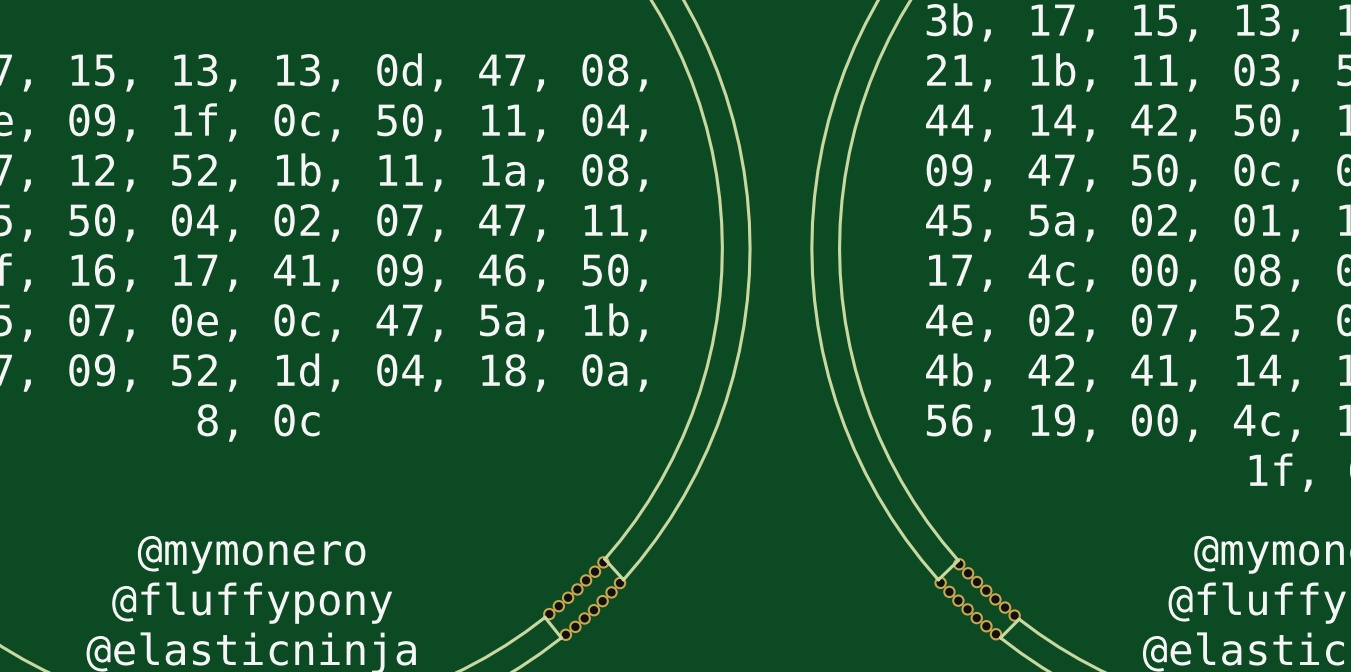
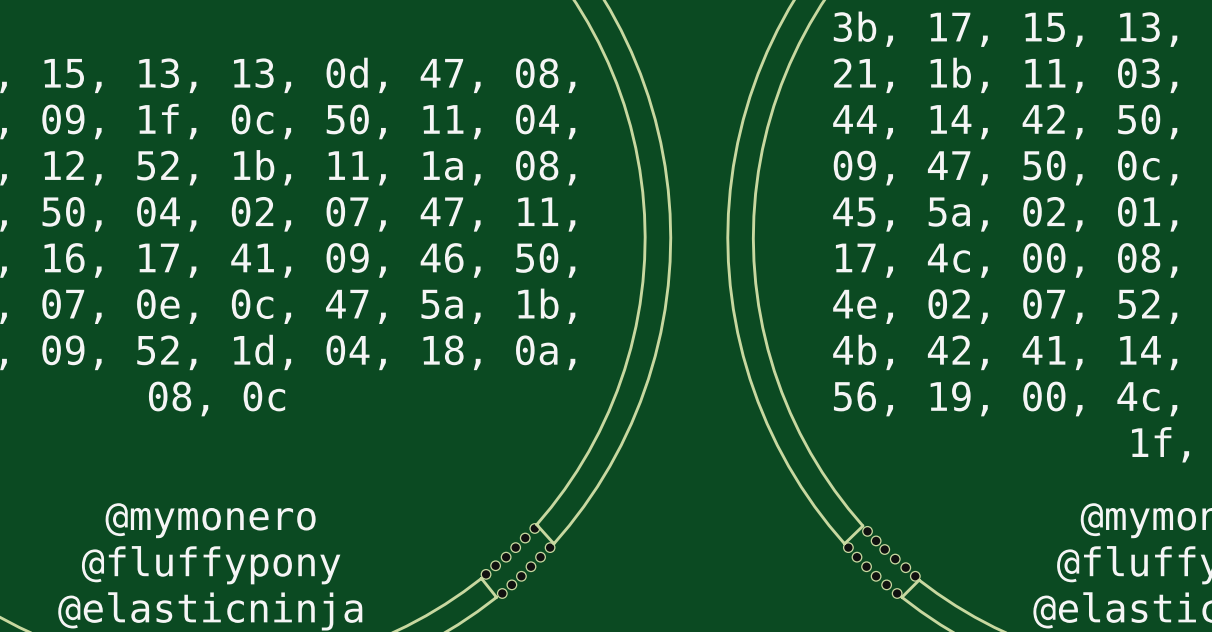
text: 8, 0c (258, 423) -> 08, 0c (217, 398)
via: (603, 562) -> none
part: none -> (534, 528)
via: (959, 564) -> none
part: none -> (867, 531)
via: (594, 571) -> none
part: none -> (525, 538)
via: (968, 573) -> none
part: none -> (876, 540)
via: (586, 580) -> none
via: (940, 582) -> none
via: (977, 582) -> none
via: (620, 583) -> none
part: none -> (515, 547)
part: none -> (550, 547)
part: none -> (848, 547)
part: none -> (884, 549)
via: (577, 589) -> none
via: (986, 590) -> none
via: (949, 591) -> none
via: (611, 592) -> none
part: none -> (506, 557)
part: none -> (540, 557)
part: none -> (856, 557)
part: none -> (895, 559)
via: (568, 597) -> none
via: (995, 599) -> none
via: (958, 600) -> none
via: (602, 601) -> none
part: none -> (495, 565)
part: none -> (530, 566)
part: none -> (866, 566)
part: none -> (905, 567)
via: (558, 606) -> none
via: (1005, 607) -> none
via: (967, 609) -> none
via: (593, 610) -> none
part: none -> (486, 574)
via: (549, 614) -> none
part: none -> (521, 576)
part: none -> (876, 576)
via: (1014, 615) -> none
part: none -> (915, 576)
via: (584, 618) -> none
via: (976, 618) -> none
part: none -> (511, 584)
part: none -> (886, 584)
via: (575, 626) -> none
via: (986, 626) -> none
part: none -> (502, 593)
part: none -> (897, 593)
via: (565, 634) -> none
via: (995, 634) -> none

